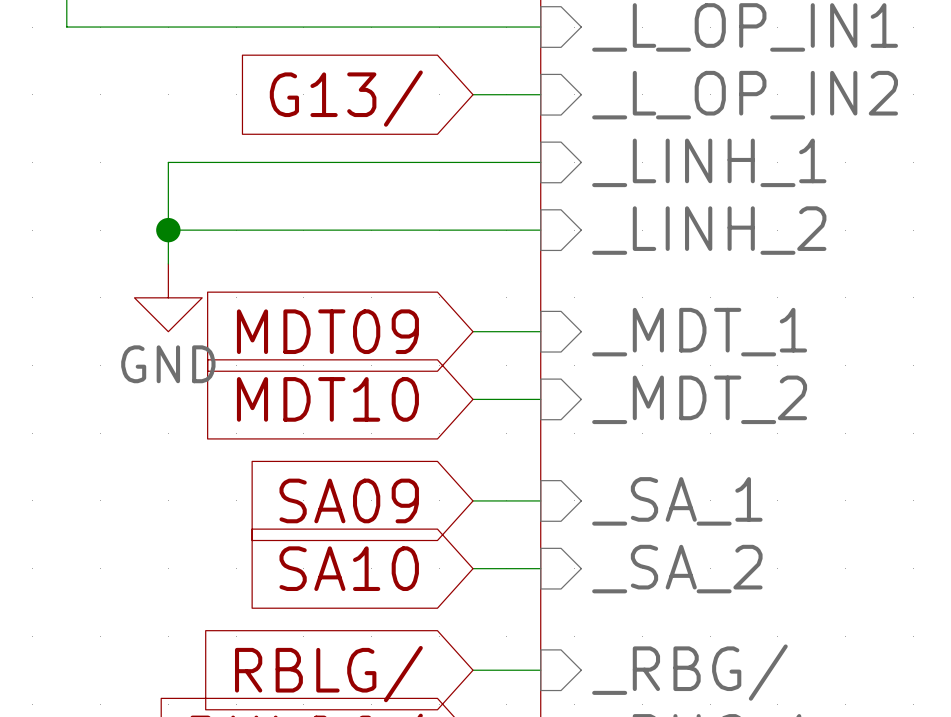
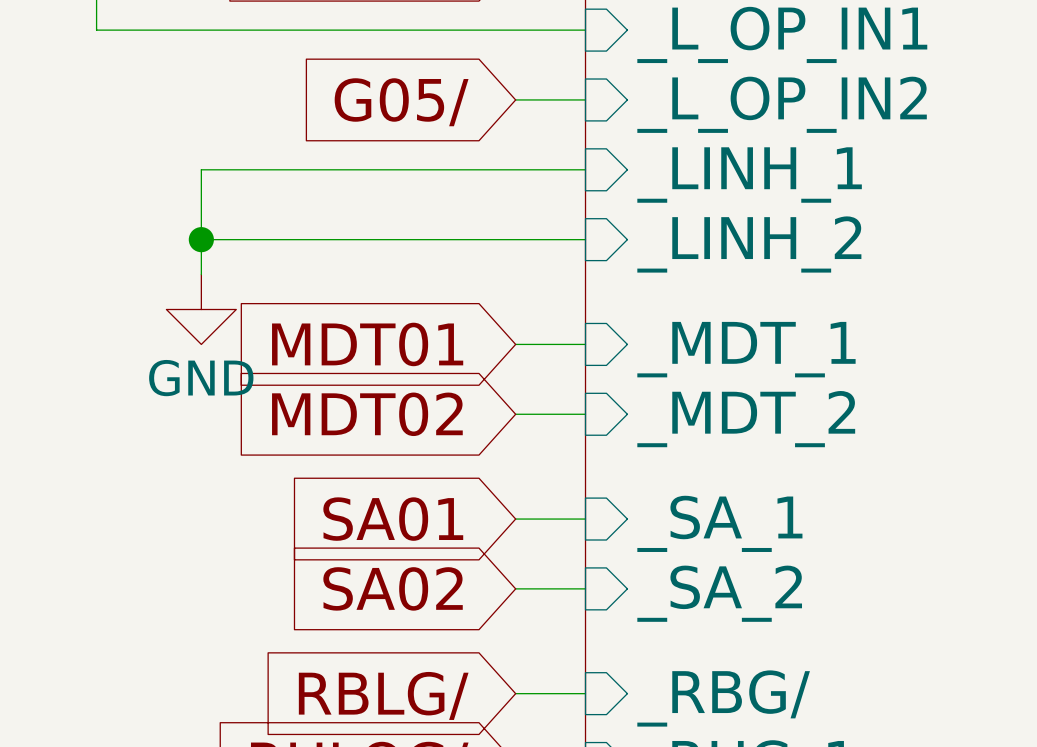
global label: G13/ (346, 98) -> G05/ (401, 102)
global label: MDT09 (327, 331) -> MDT01 (367, 344)
global label: MDT10 (327, 399) -> MDT02 (367, 414)
global label: SA09 (349, 500) -> SA01 (393, 519)
global label: SA10 (349, 568) -> SA02 (393, 588)

